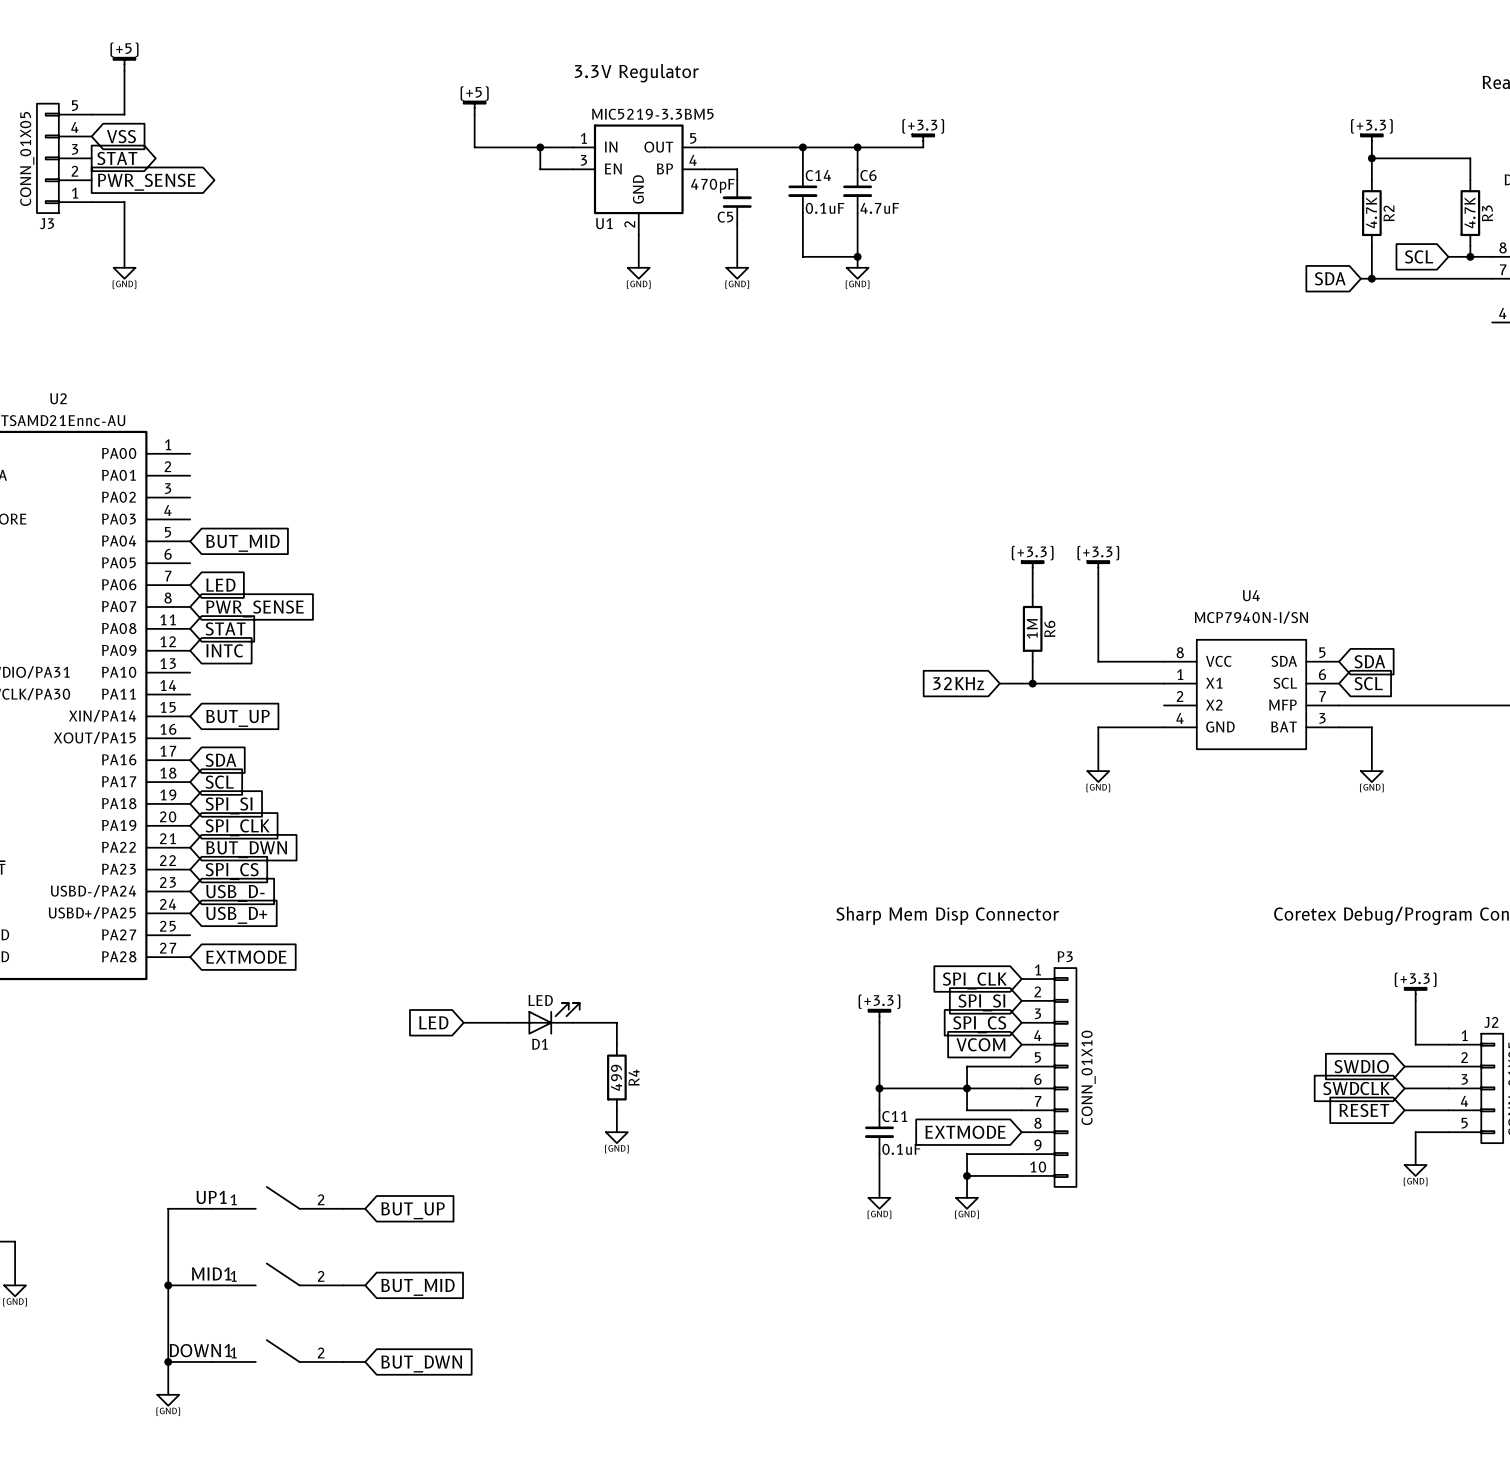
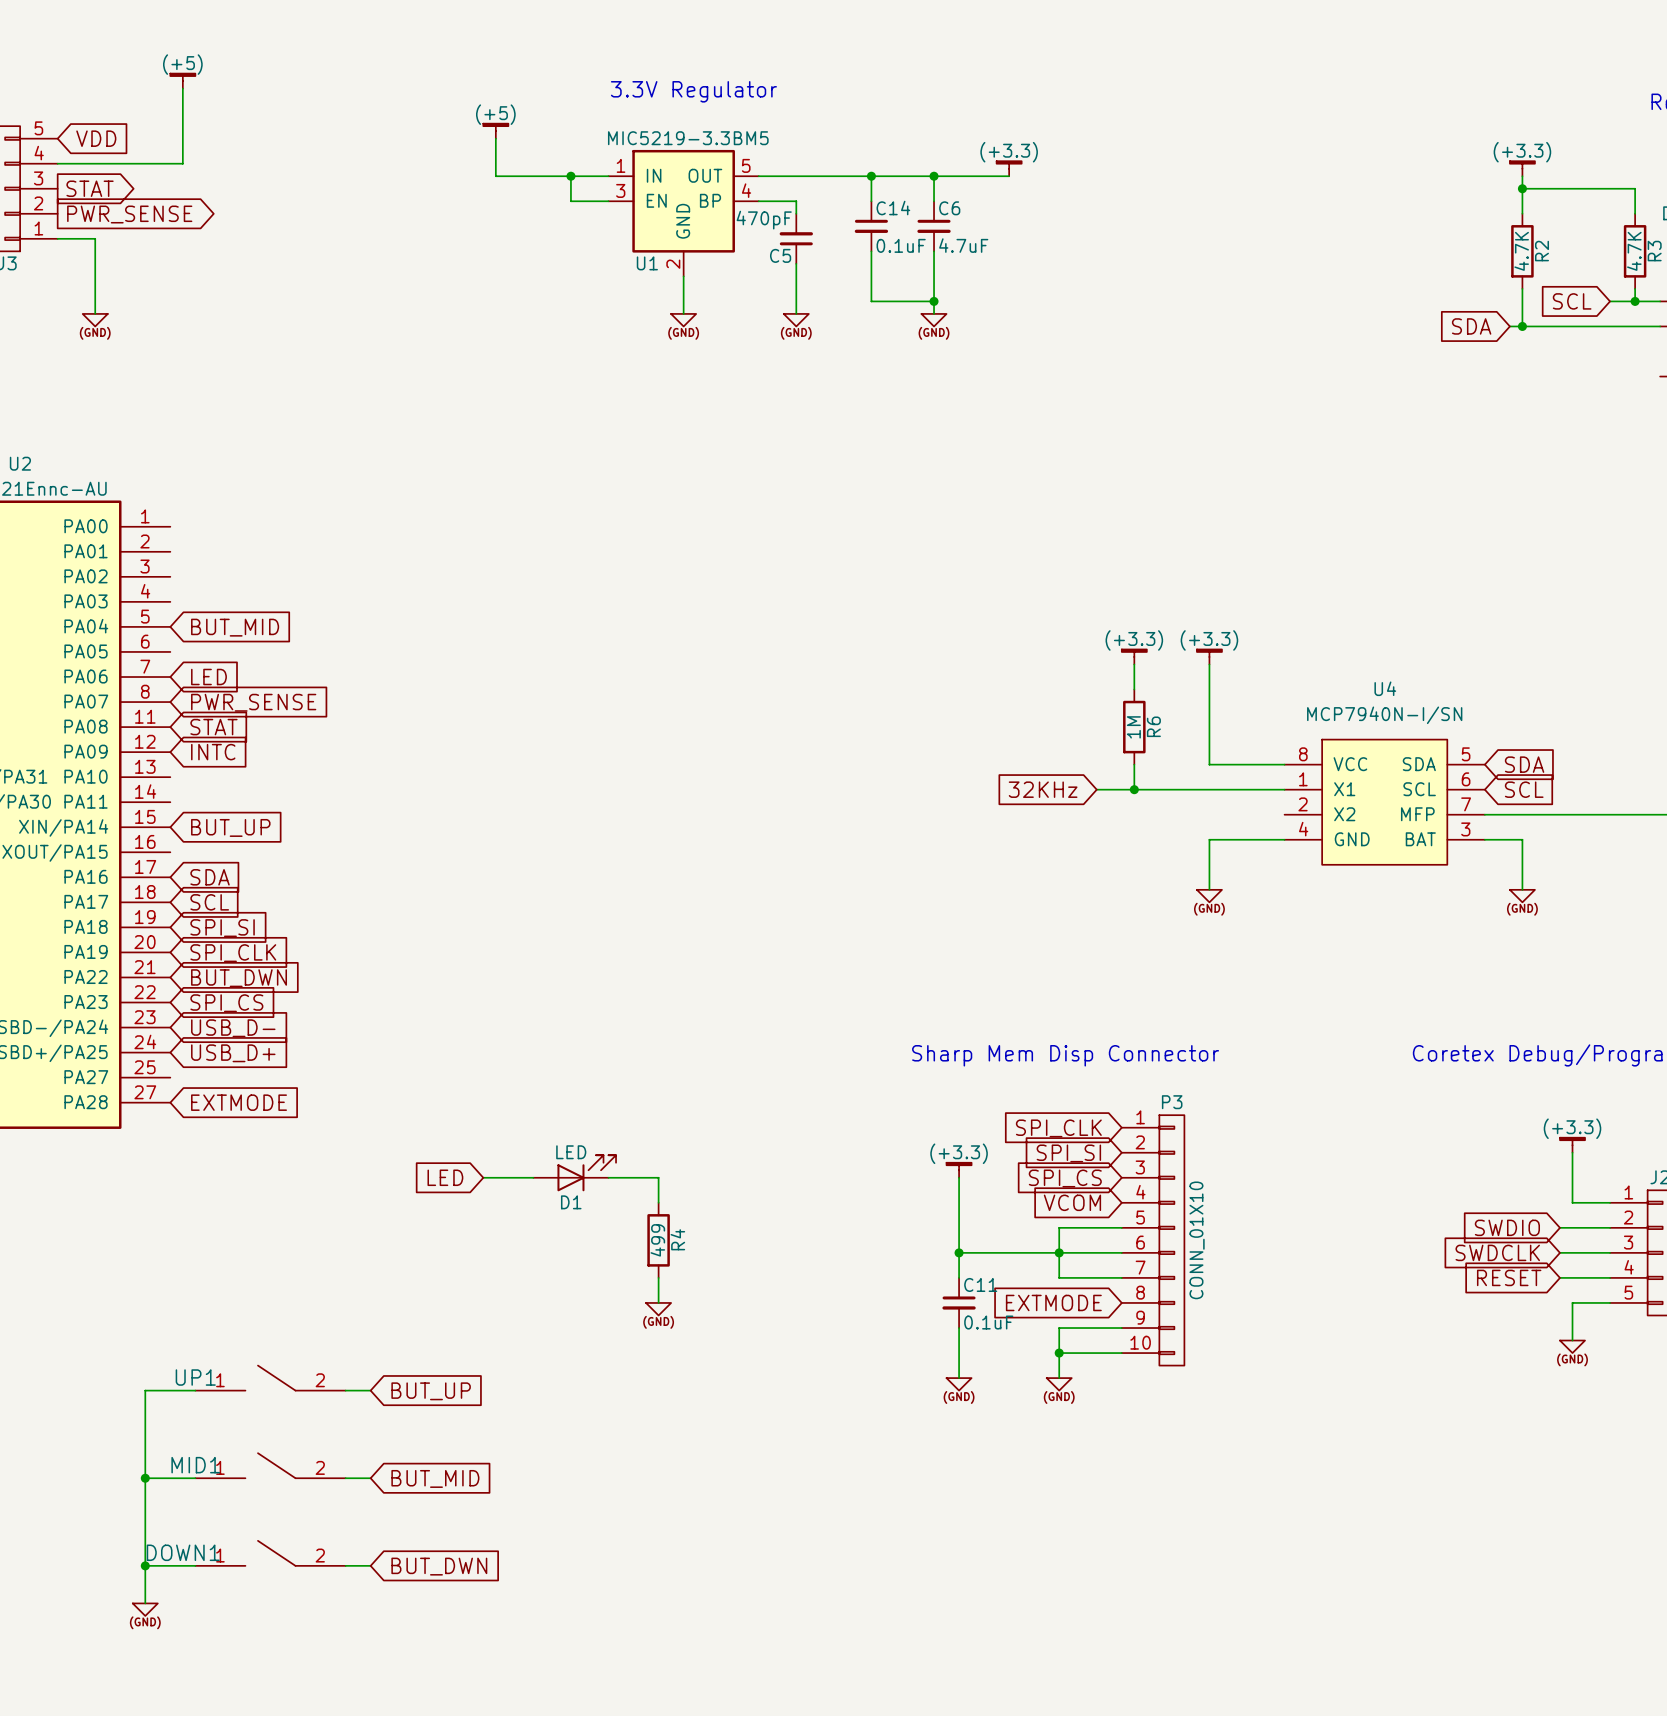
power symbol position: (+5) (124, 64) -> (+5) (182, 81)
wire: (124, 70) (124, 114) (91, 114) -> none
wire: none -> (182, 88) (182, 163) (57, 163)
global label: none -> VDD (96, 138)
global label: VSS (121, 136) -> none

